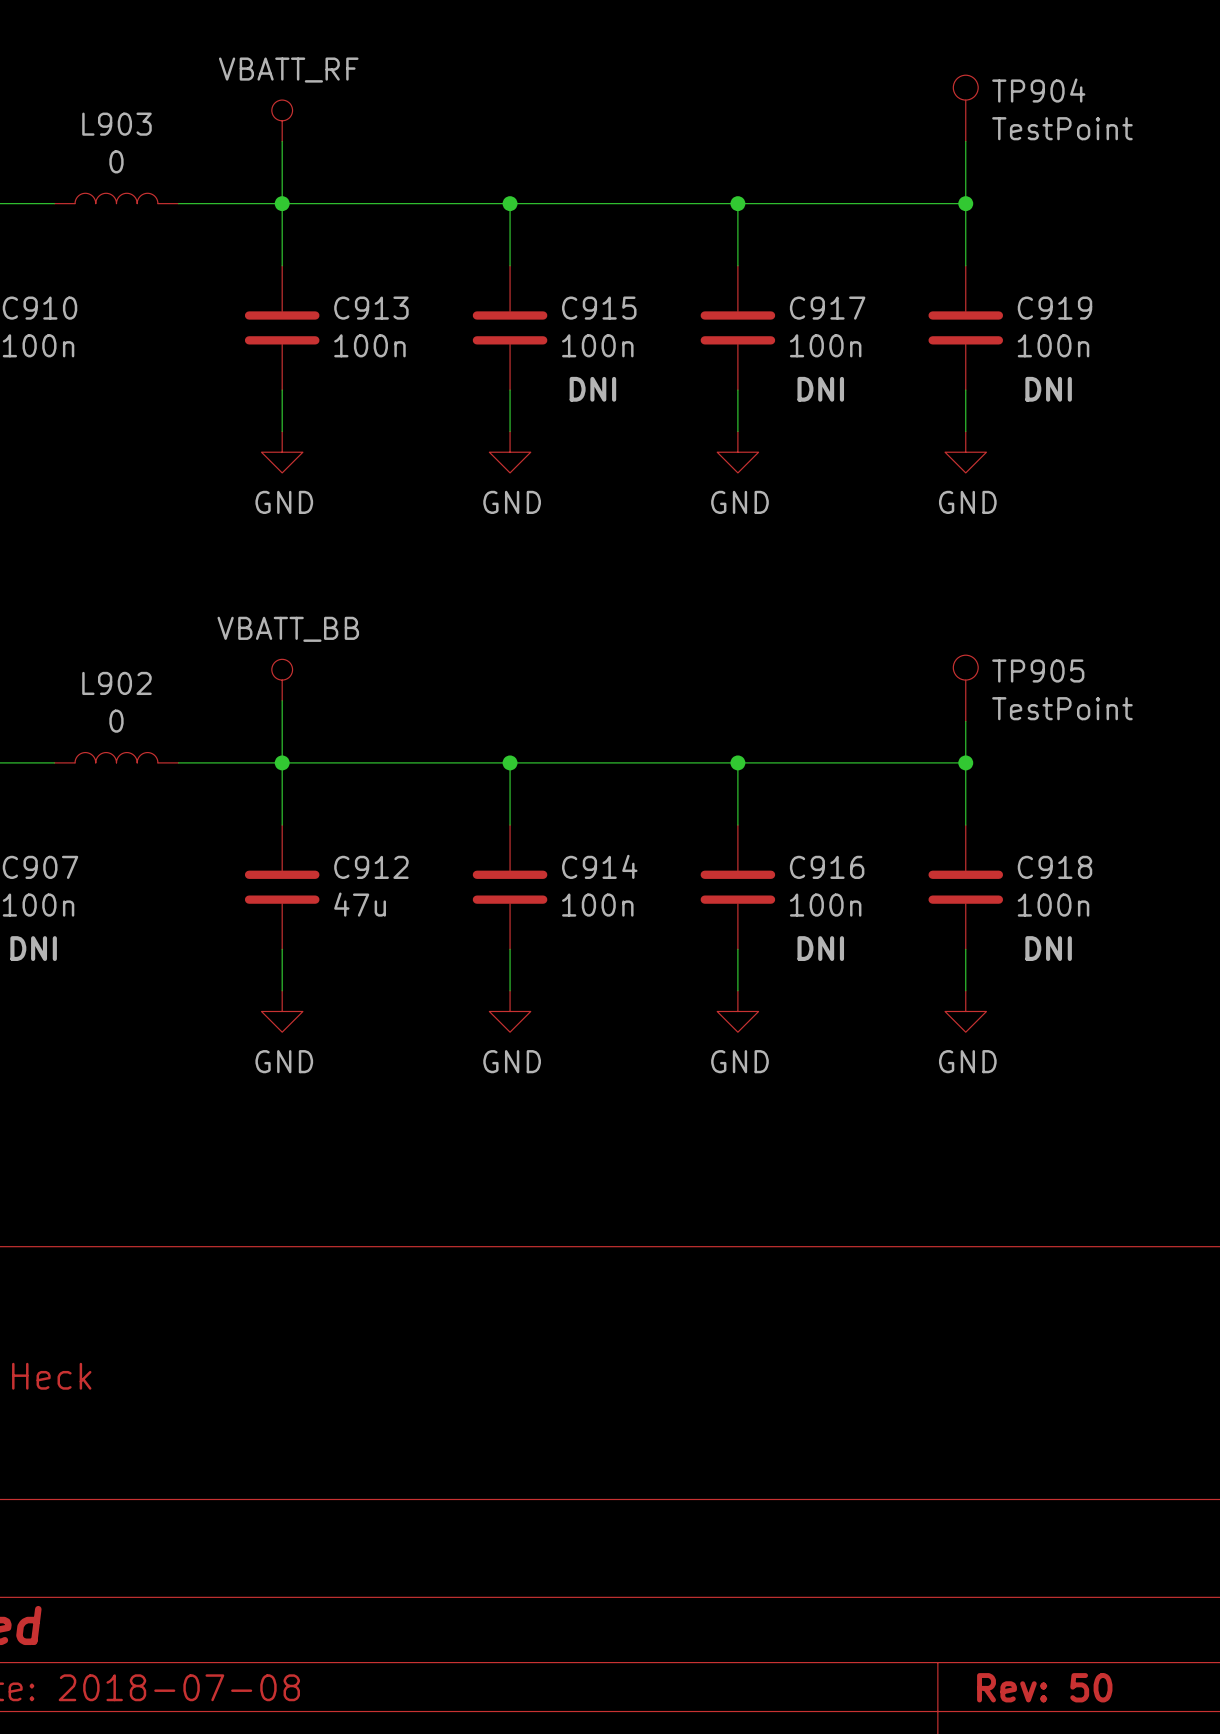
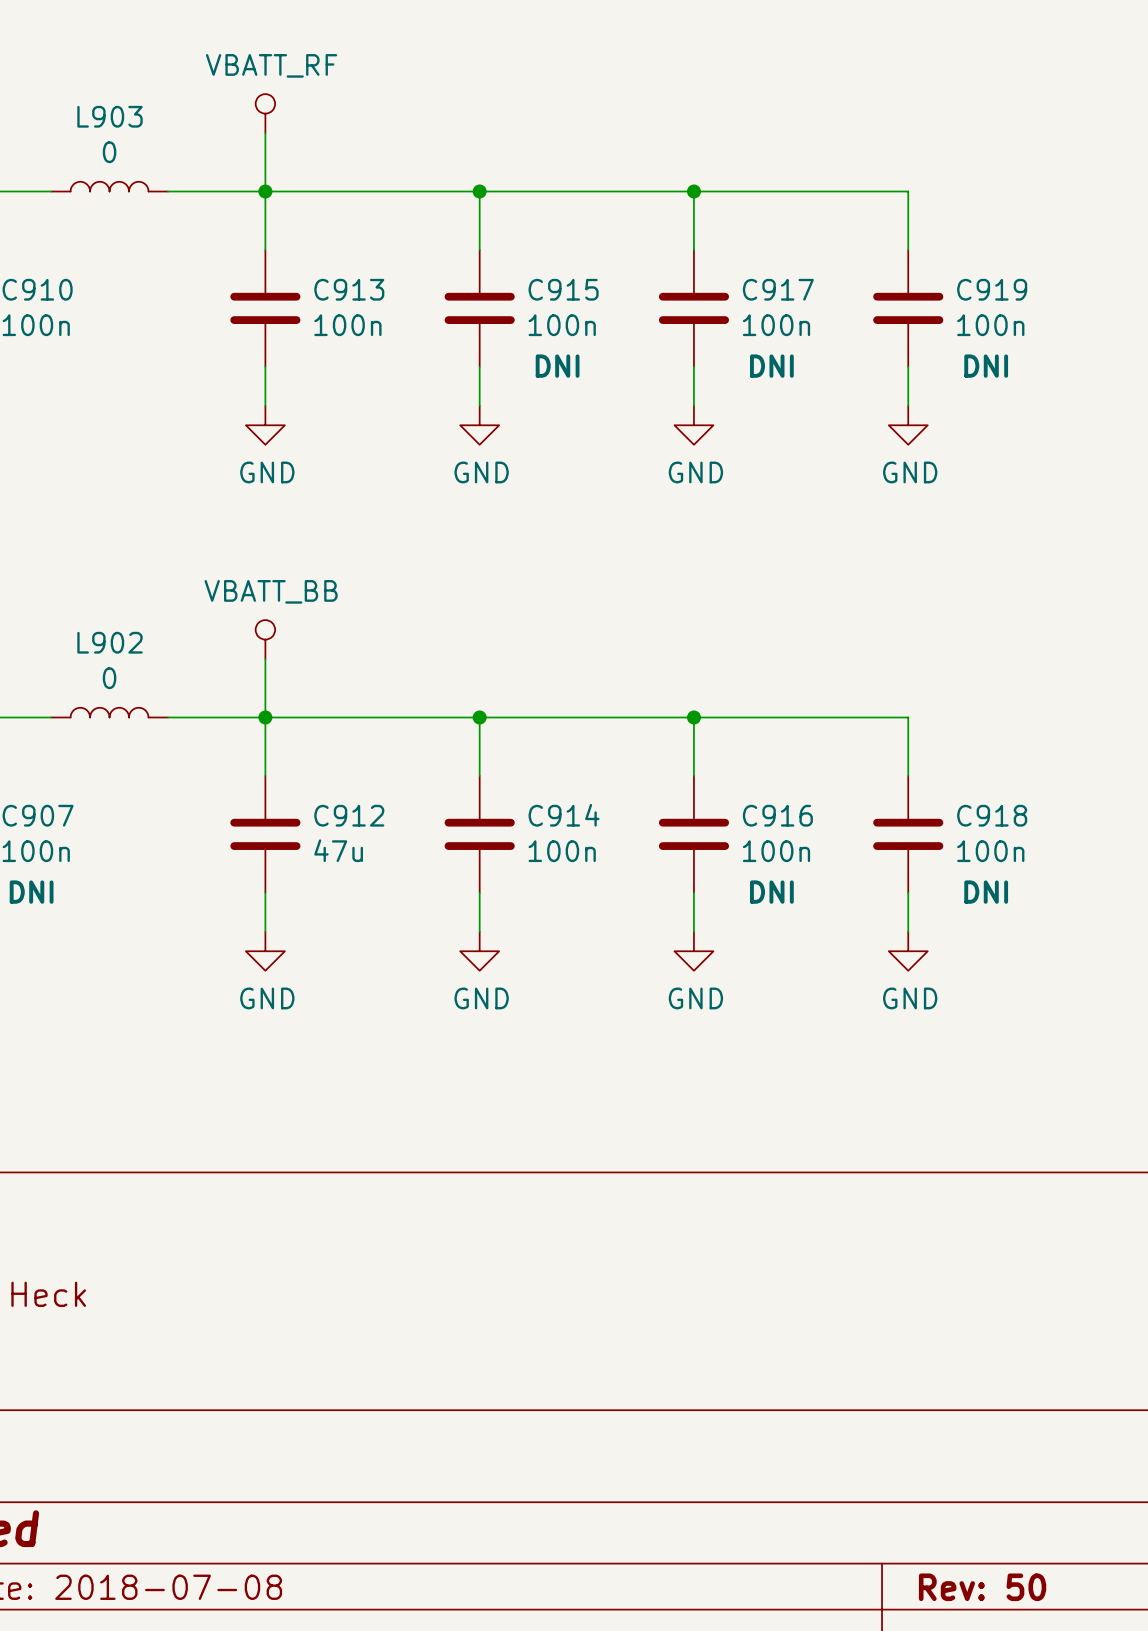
TP904: TestPoint (965, 108) -> none
wire: (965, 141) (965, 203) -> none
junction: (965, 203) -> none
TP905: TestPoint (965, 688) -> none
wire: (965, 721) (965, 762) -> none
junction: (965, 762) -> none

